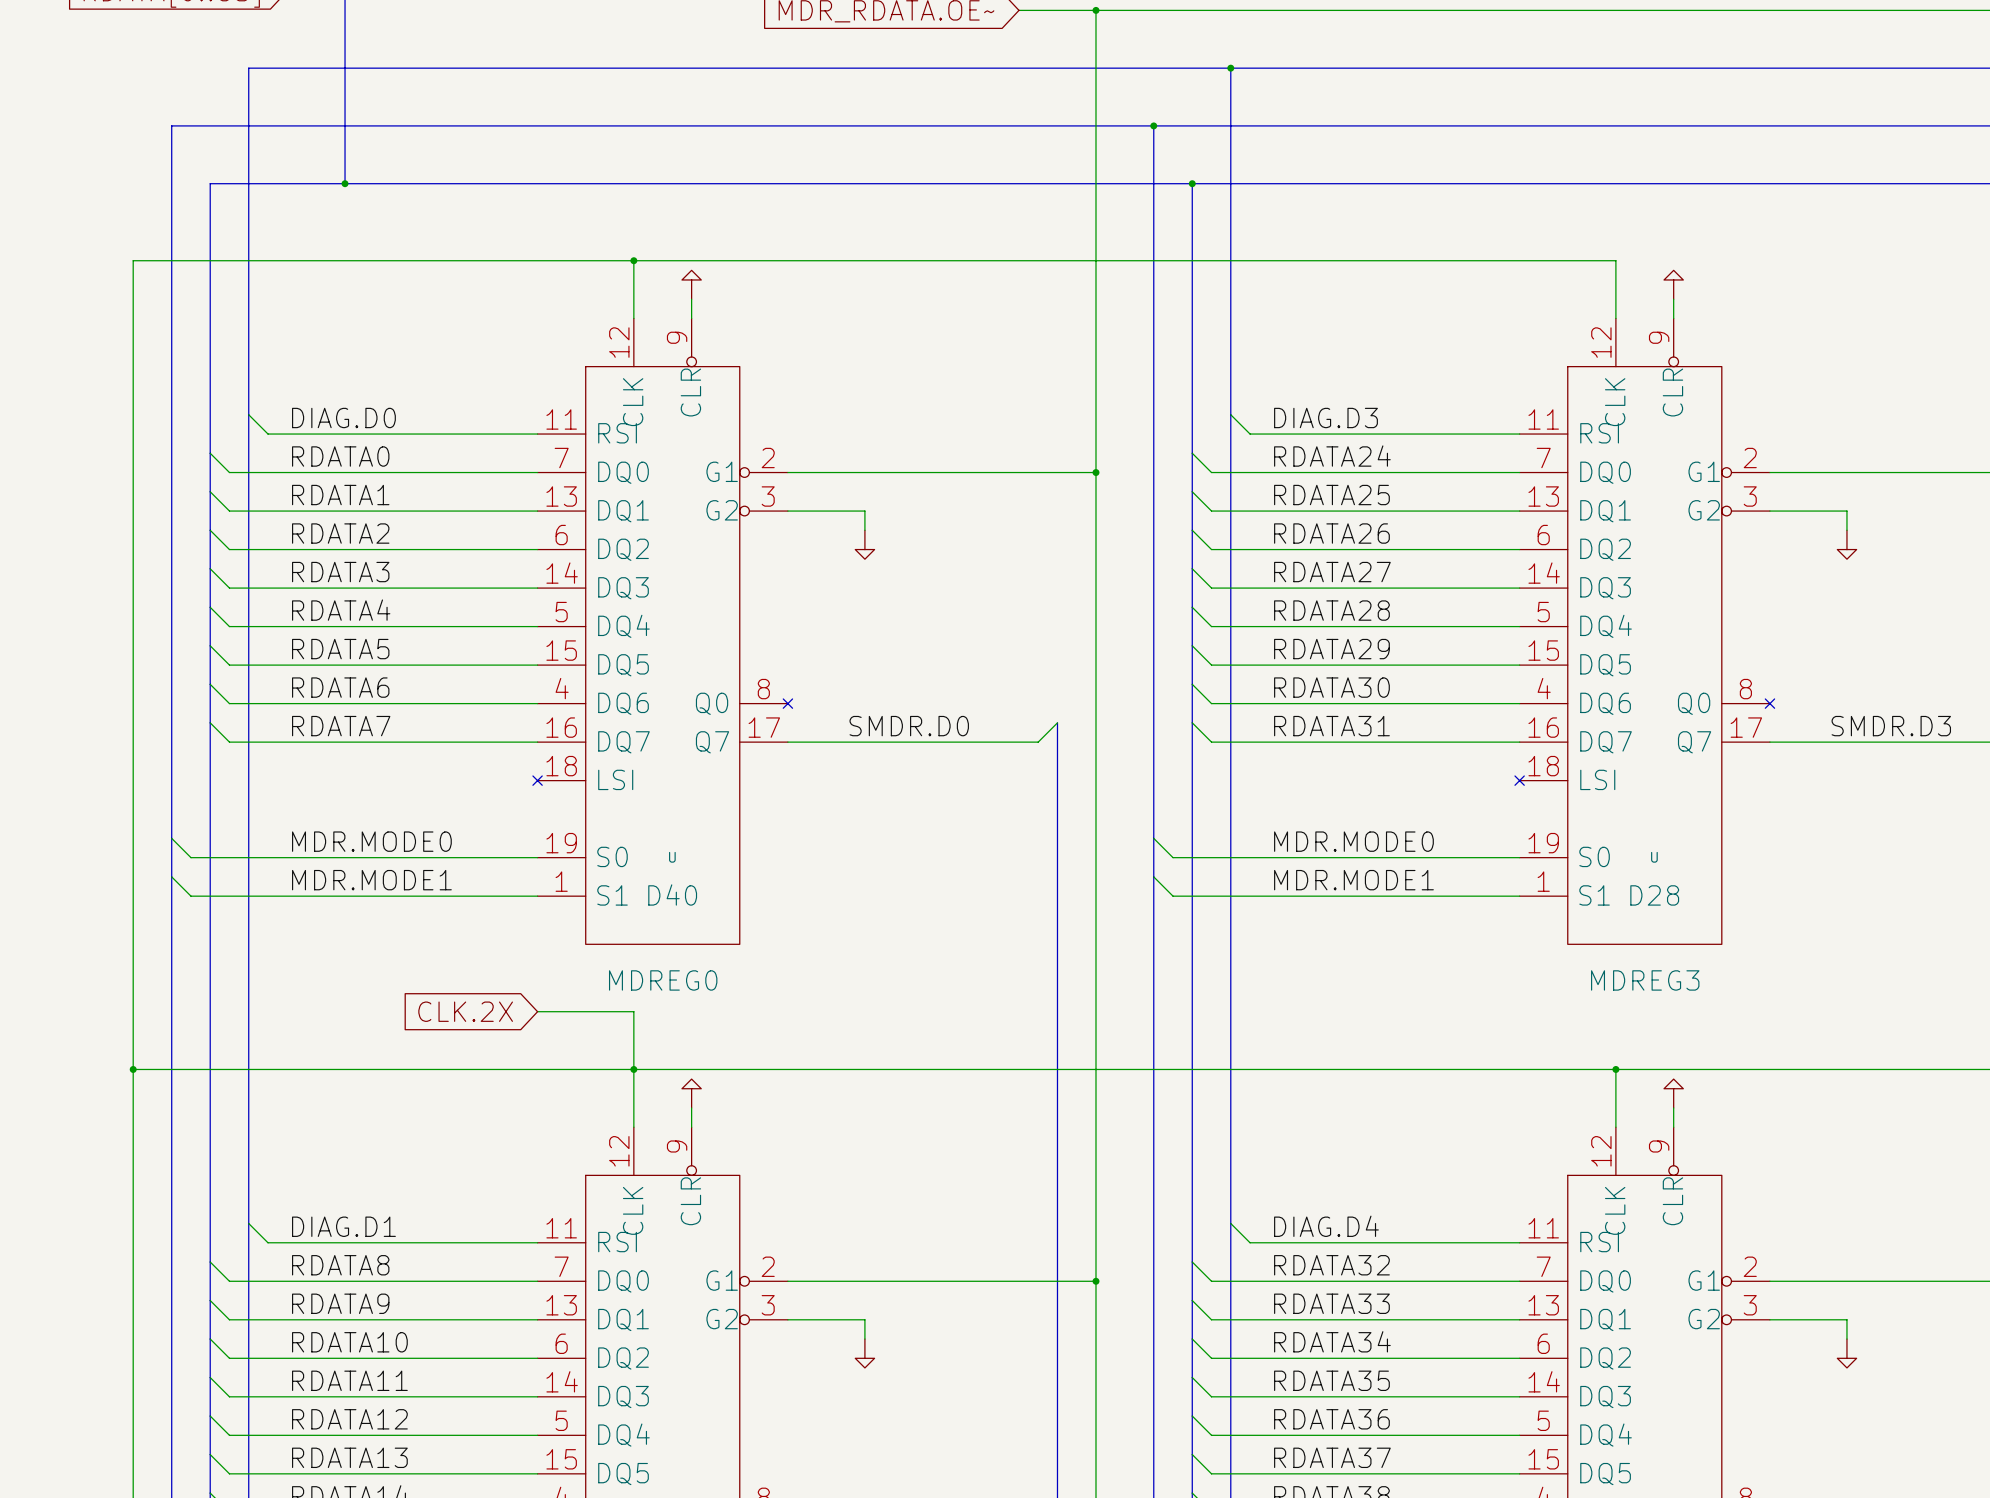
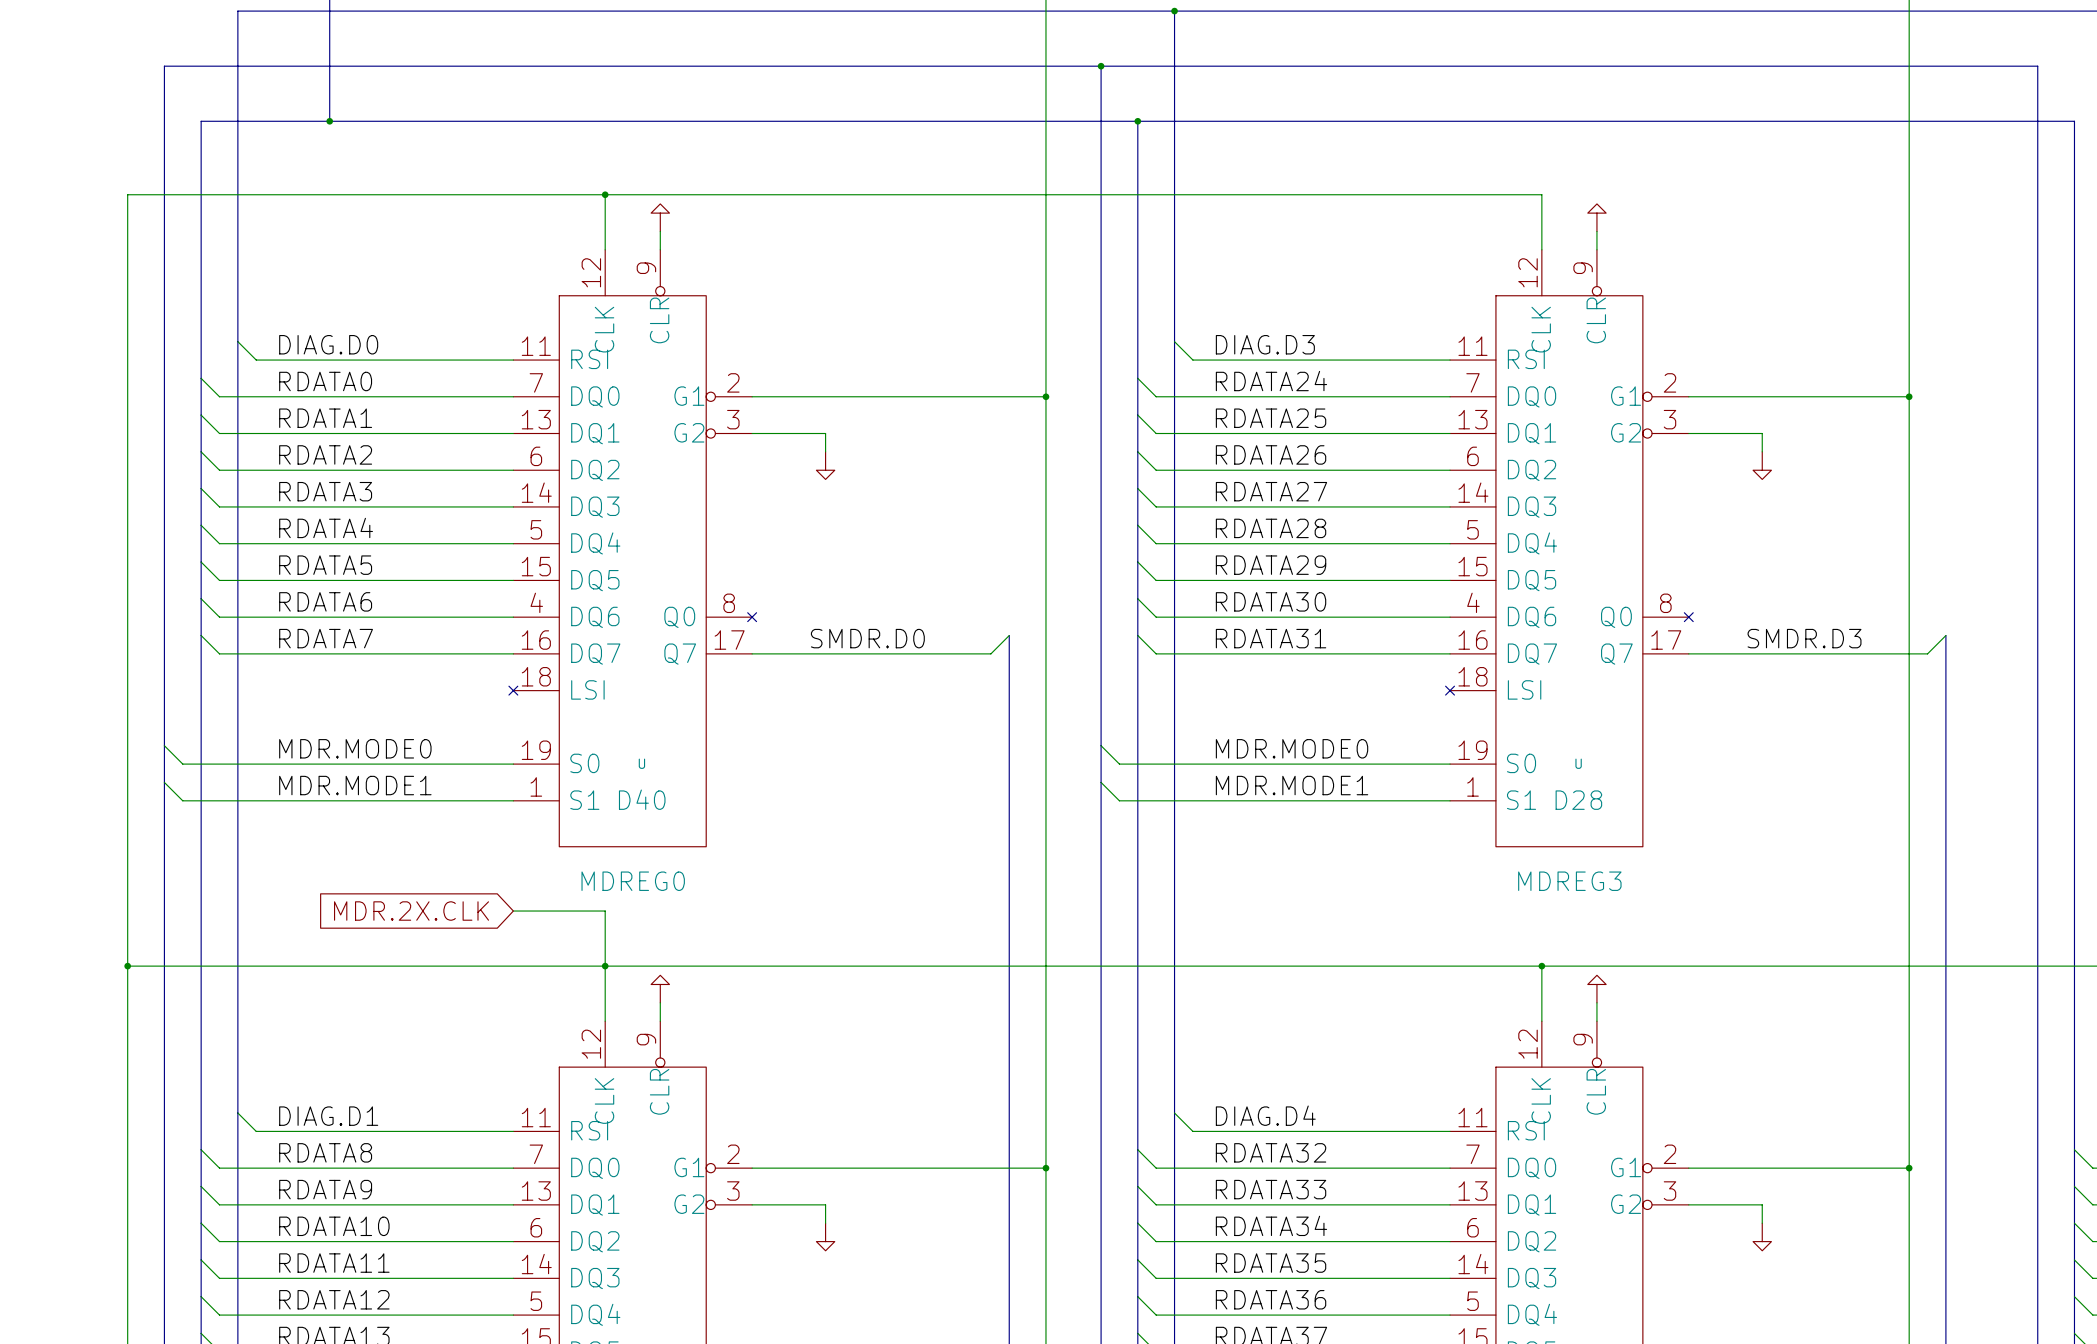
global label: CLK.2X (465, 1011) -> MDR.2X.CLK (411, 911)

